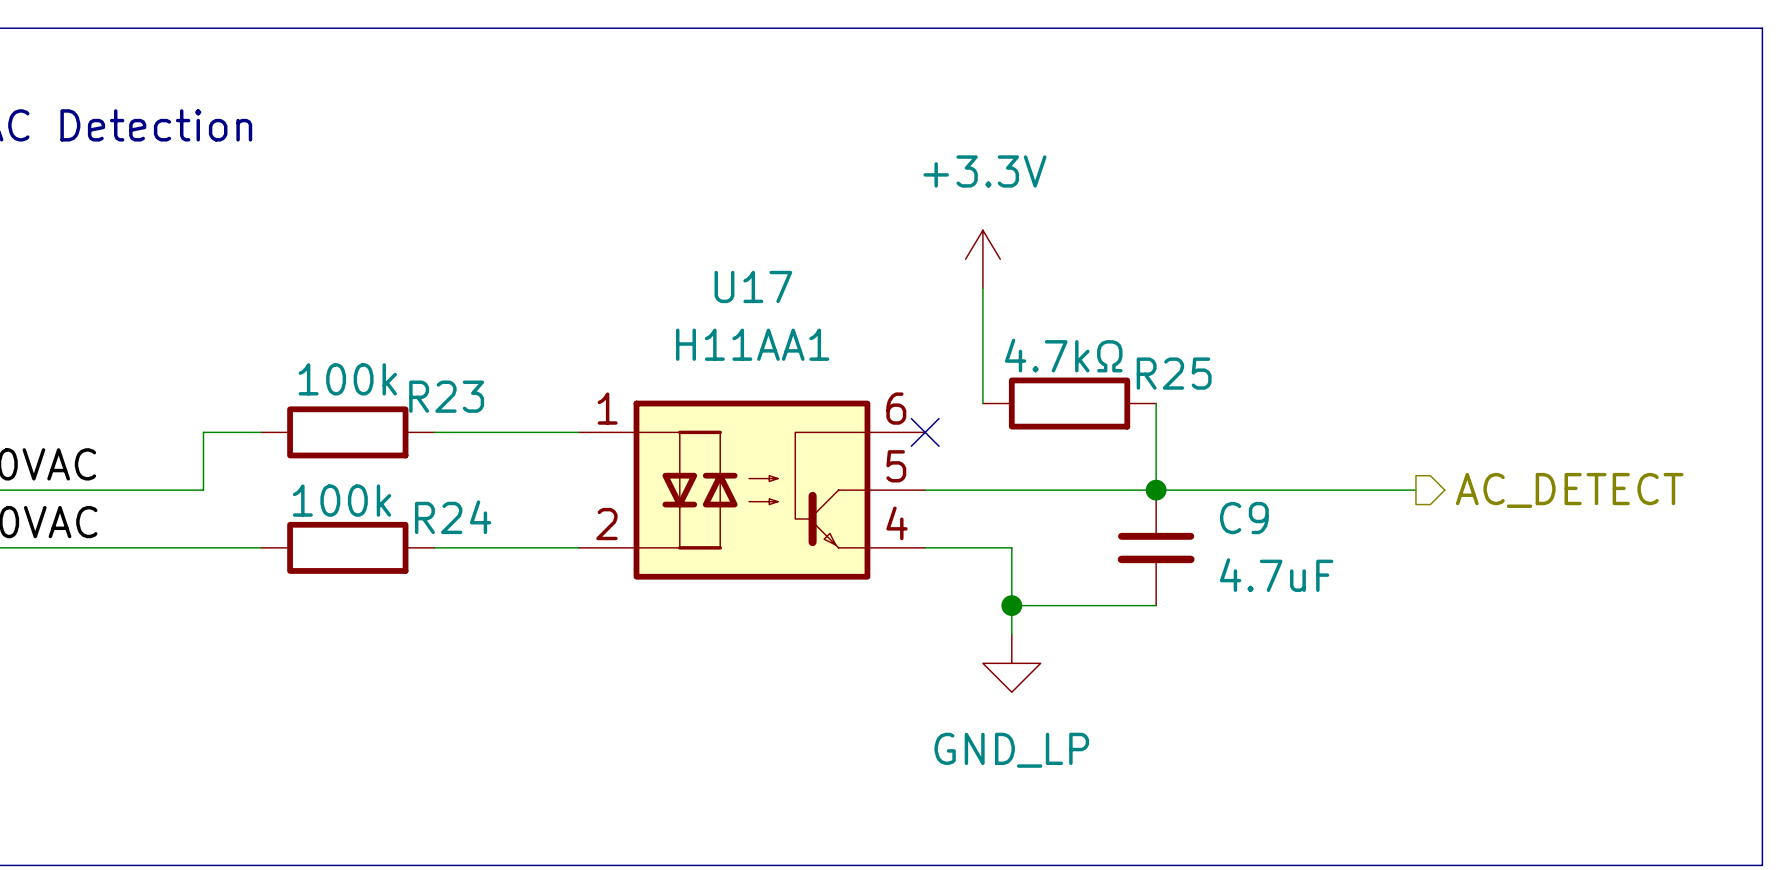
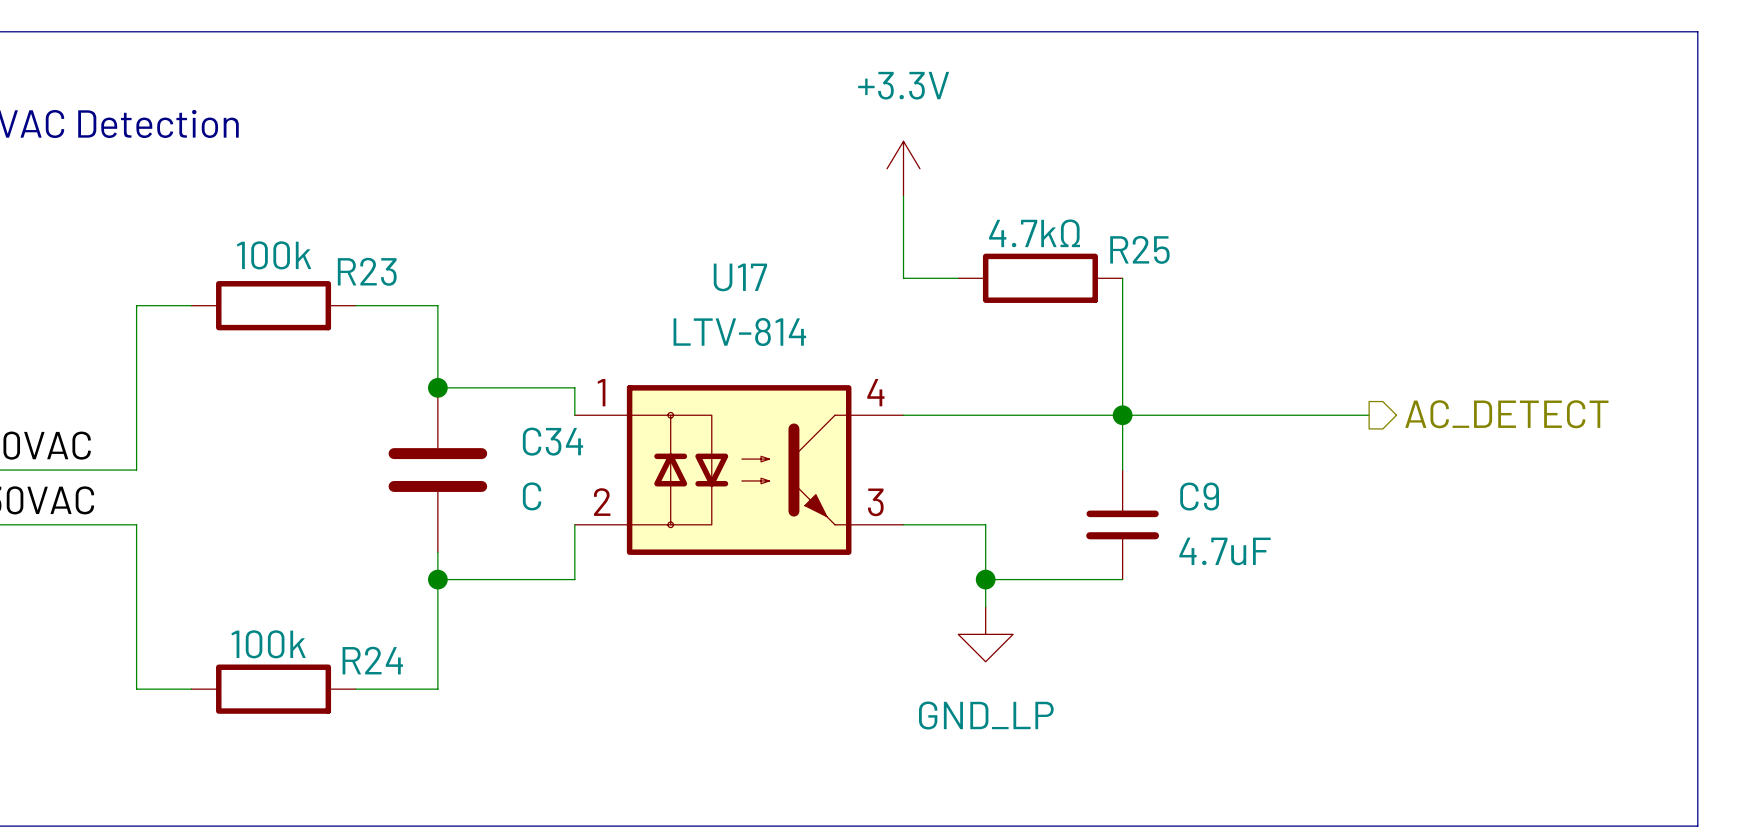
power symbol position: +3.3V (982, 259) -> +3.3V (903, 168)
wire: (982, 288) (982, 403) -> (958, 278) (903, 278) (903, 196)
wire: none -> (1122, 278) (1122, 387)
U17 value: H11AA1 (752, 344) -> LTV-814 (739, 332)
U17 symbol: [578, 400, 926, 580] -> [574, 385, 904, 555]
junction: none -> (437, 387)
R25 position: (1069, 403) -> (1040, 278)
wire: (261, 432) (203, 432) (203, 490) (116, 490) -> (191, 305) (136, 305) (136, 470)
R23 position: (347, 432) -> (273, 305)
wire: (434, 432) (578, 432) -> (355, 305) (437, 305) (437, 387) (574, 387) (574, 415)
no-connect mark: (925, 432) -> none
C34: none -> C (437, 470)
wire: (925, 490) (1415, 490) -> (903, 415) (1369, 415)
junction position: (1156, 490) -> (1122, 415)
hierarchical label position: AC_DETECT (1569, 490) -> AC_DETECT (1506, 414)
wire: (116, 547) (261, 547) -> (136, 524) (136, 689) (191, 689)
R24 position: (347, 547) -> (273, 689)
wire: (434, 547) (578, 547) -> (437, 579) (574, 579) (574, 524)
wire: none -> (437, 552) (437, 689) (355, 689)
junction: none -> (437, 579)

